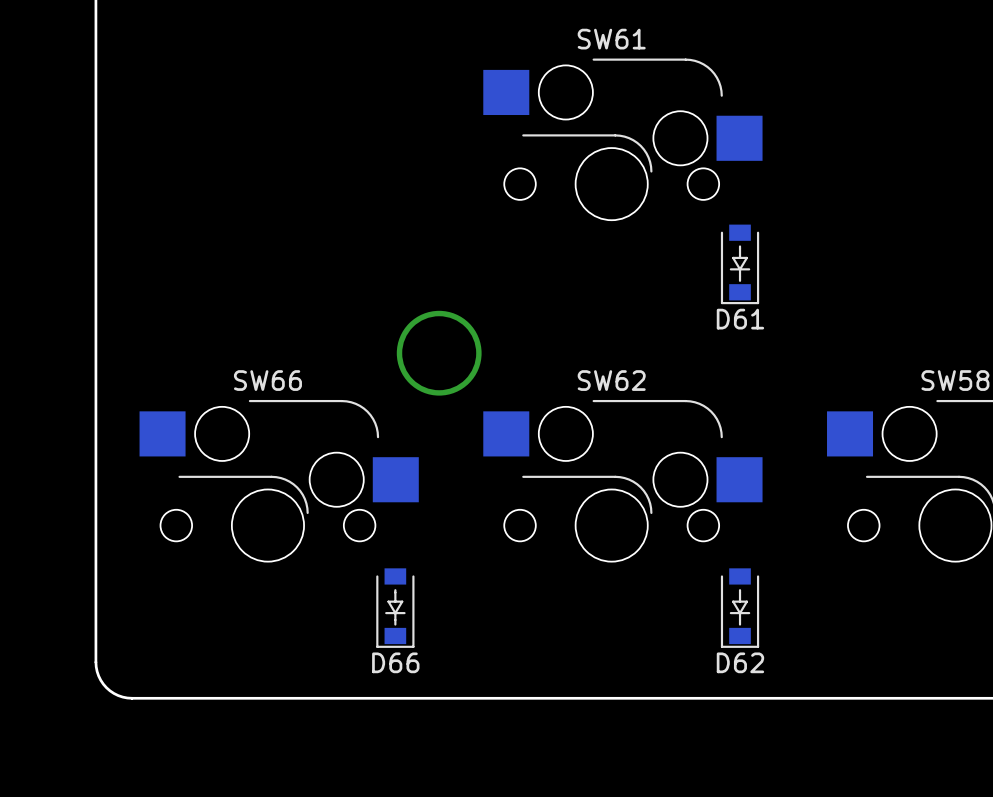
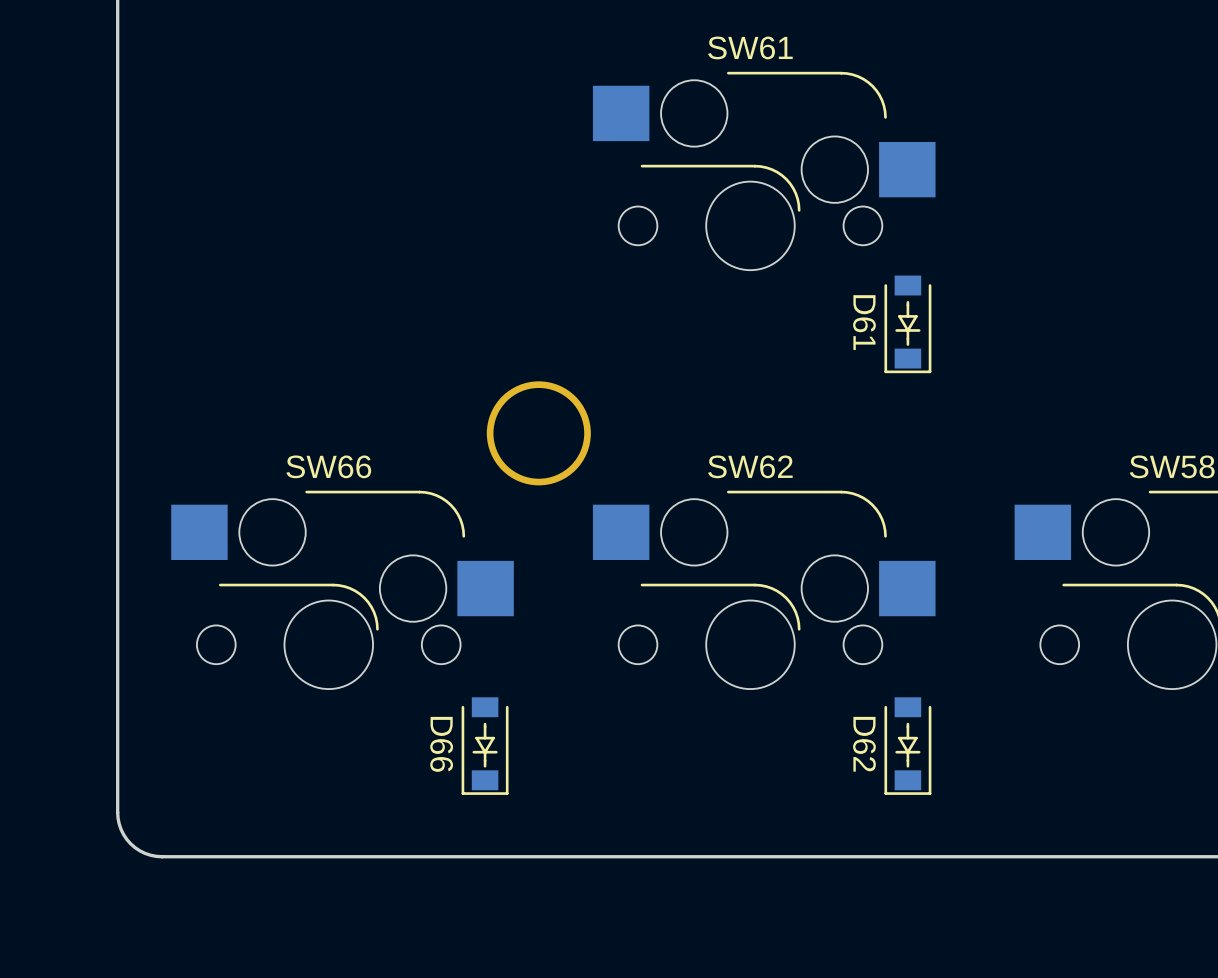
D61 name rotation: 0° (740, 319) -> 90° clockwise (864, 322)
D61 name position: D61 (740, 319) -> D61 (864, 322)
D66 name rotation: 0° (395, 662) -> 90° clockwise (441, 744)
D66 name position: D66 (395, 662) -> D66 (441, 744)
D62 name rotation: 0° (740, 662) -> 90° clockwise (864, 744)
D62 name position: D62 (740, 662) -> D62 (864, 744)

